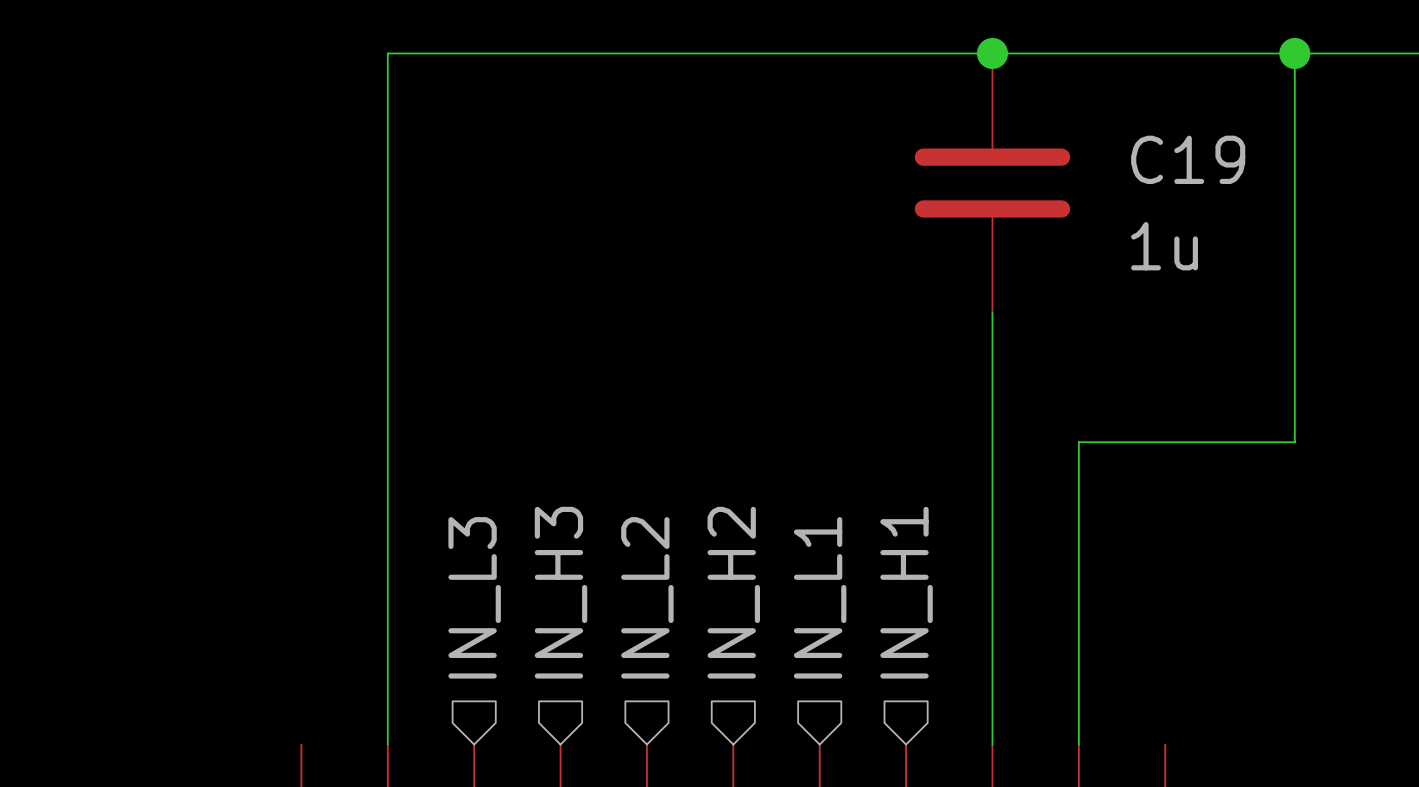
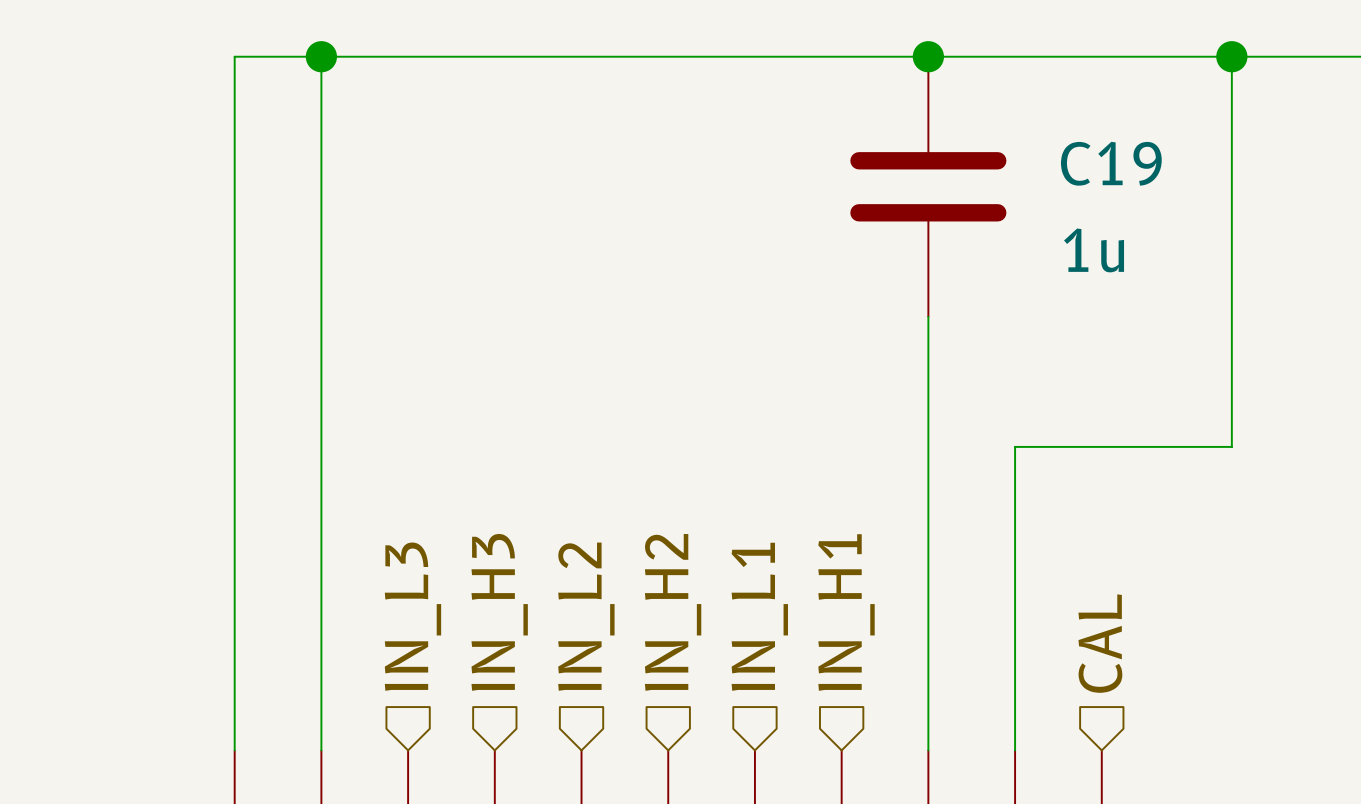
wire: none -> (321, 56) (234, 56) (234, 750)
junction: none -> (321, 56)
hierarchical label: none -> CAL (1100, 643)

